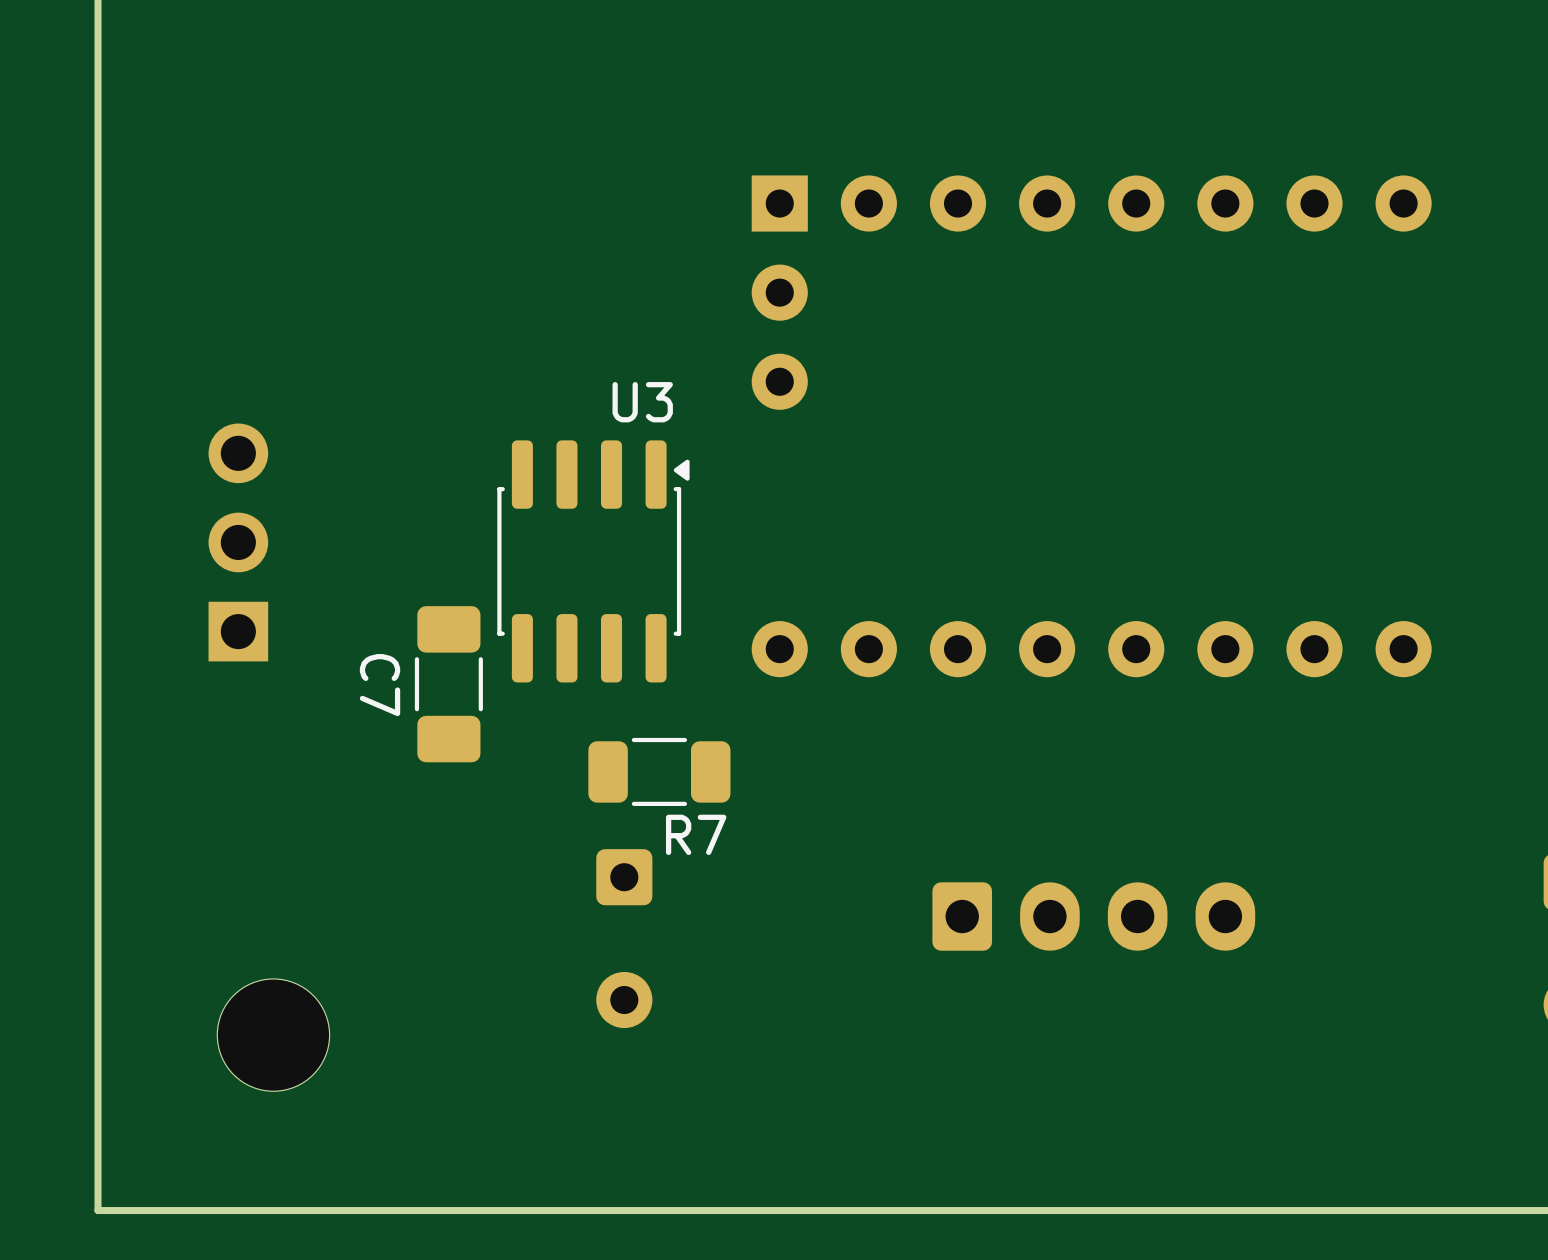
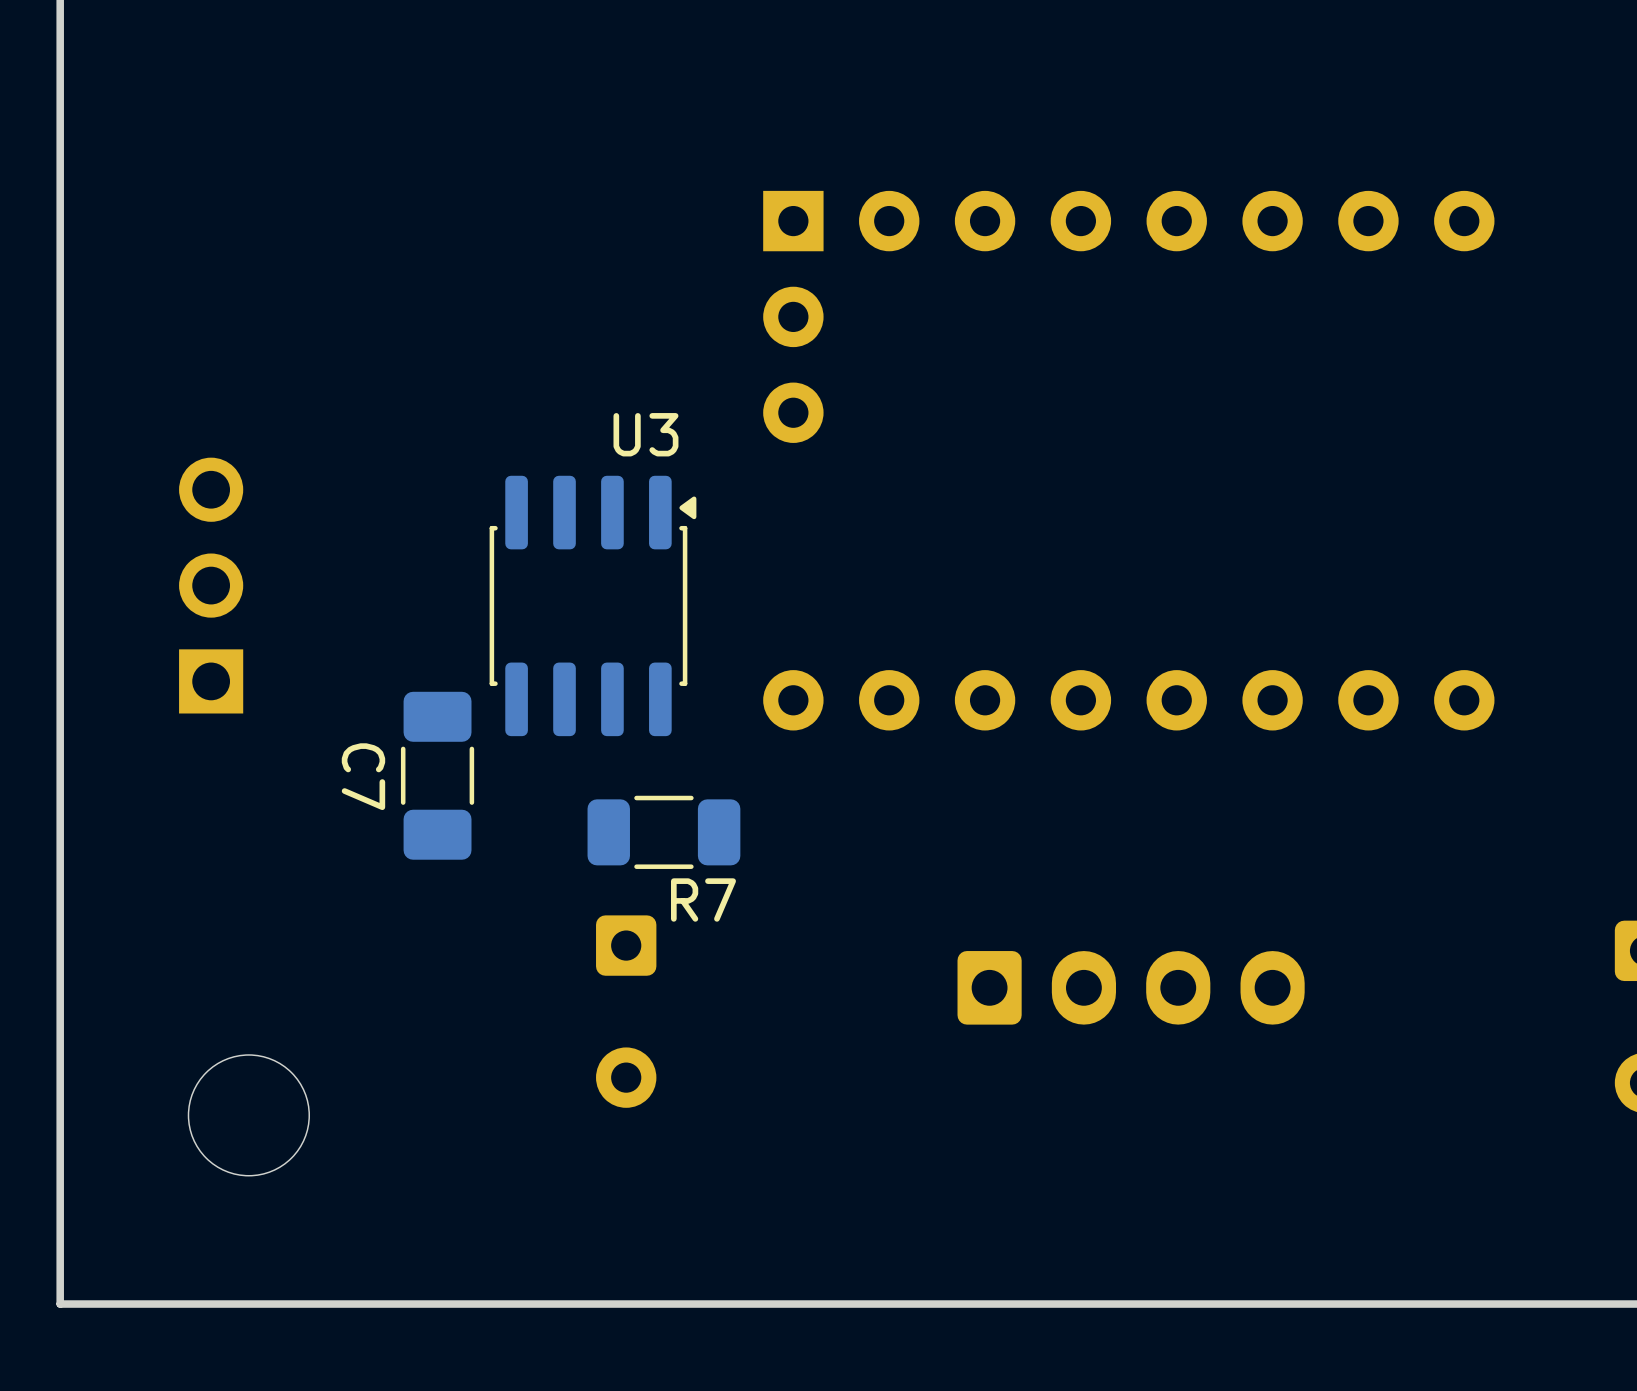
C7 position: (448, 684) -> (437, 775)

